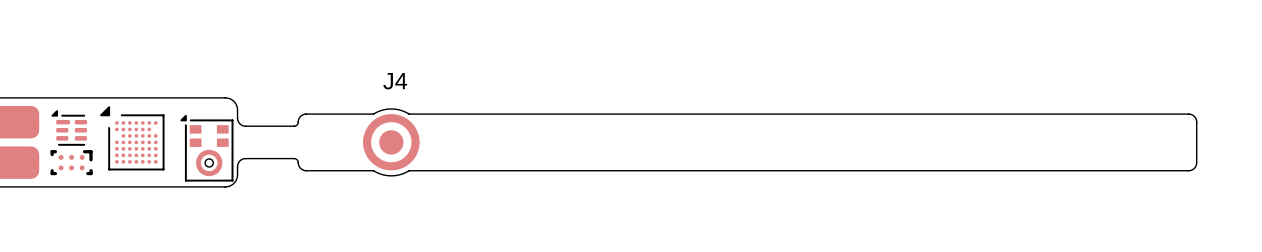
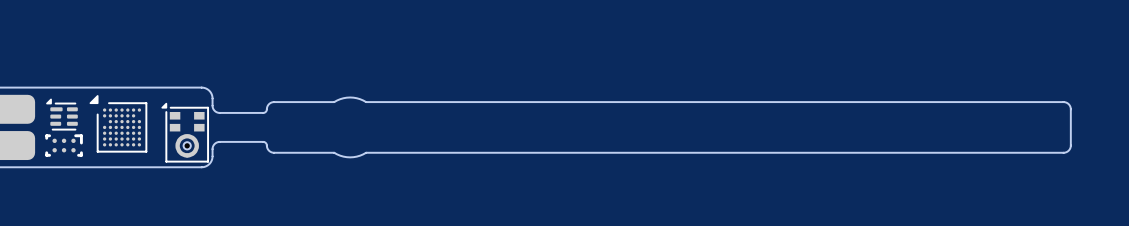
J4: (391, 142) -> none

